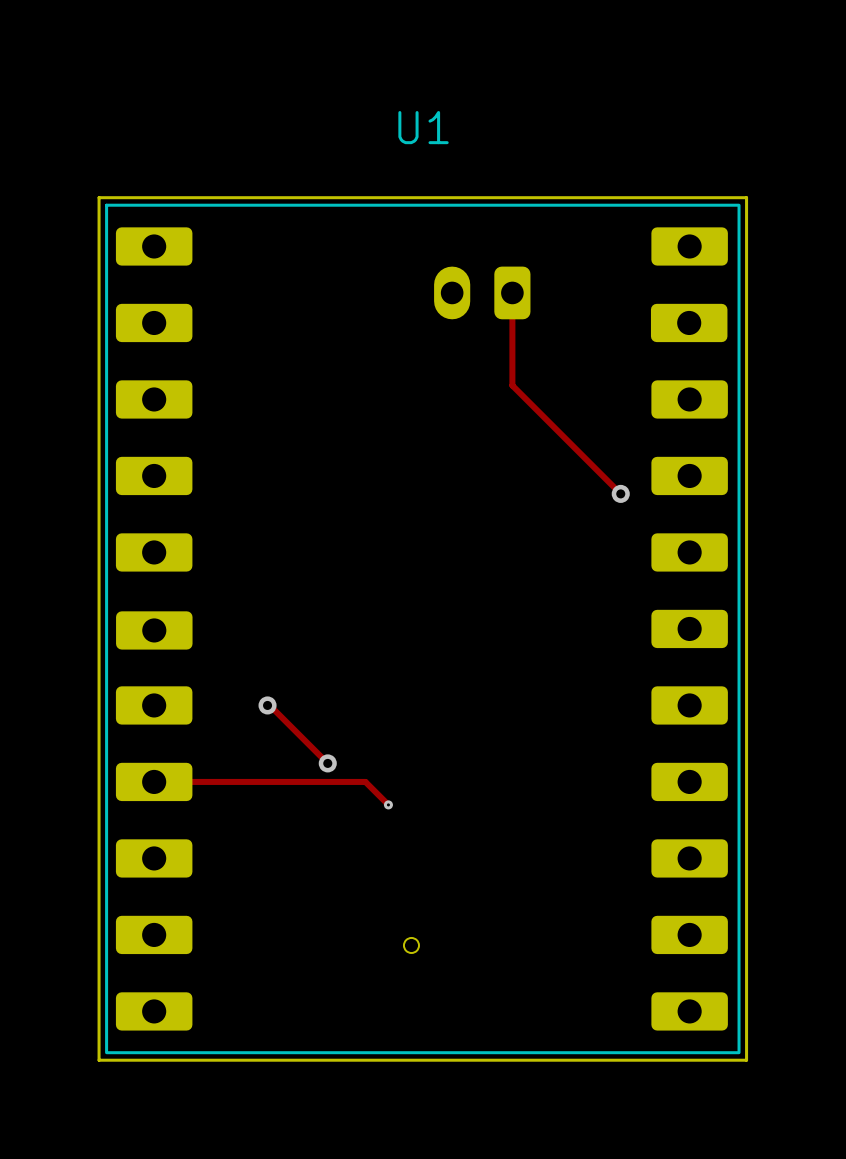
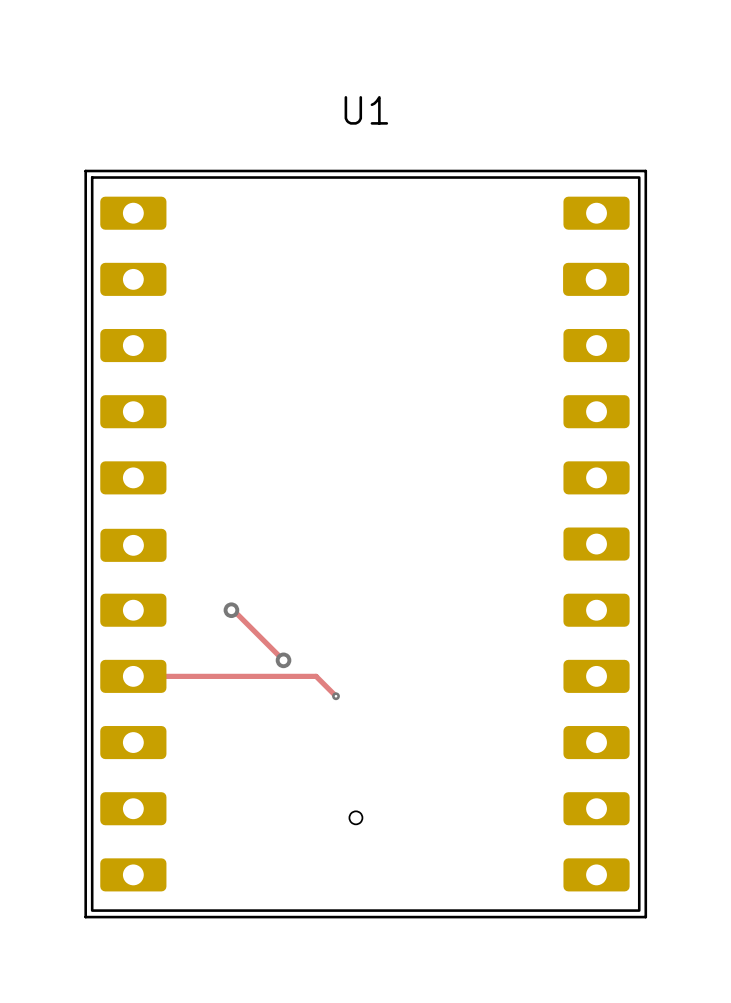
part: (482, 292) -> none
track: (512, 292) (512, 385) (620, 493) -> none
via: (620, 493) -> none

